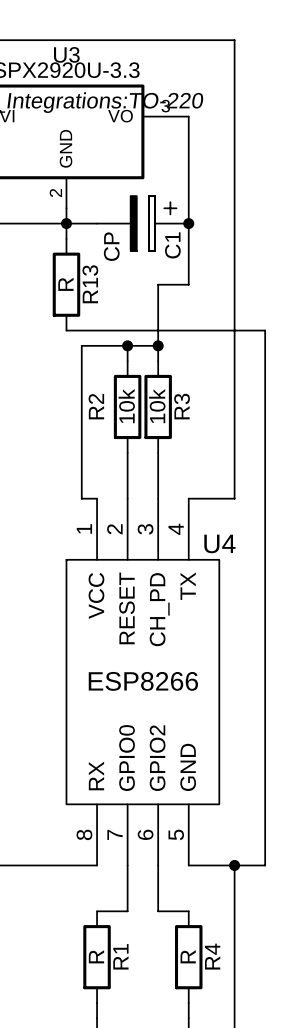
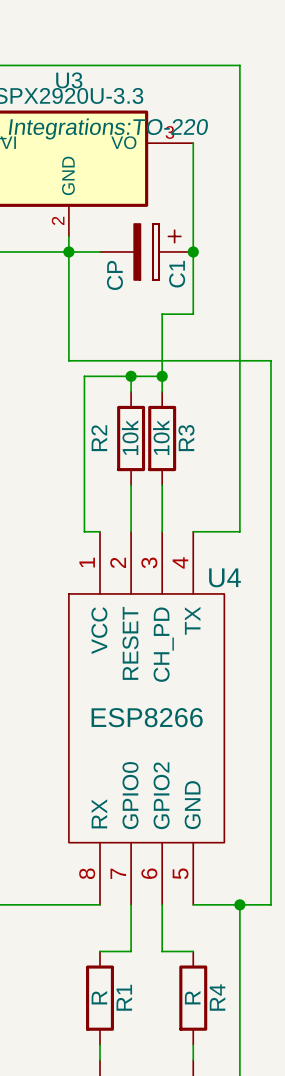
wire: none -> (68, 267) (68, 360)
R13: R (66, 284) -> none

